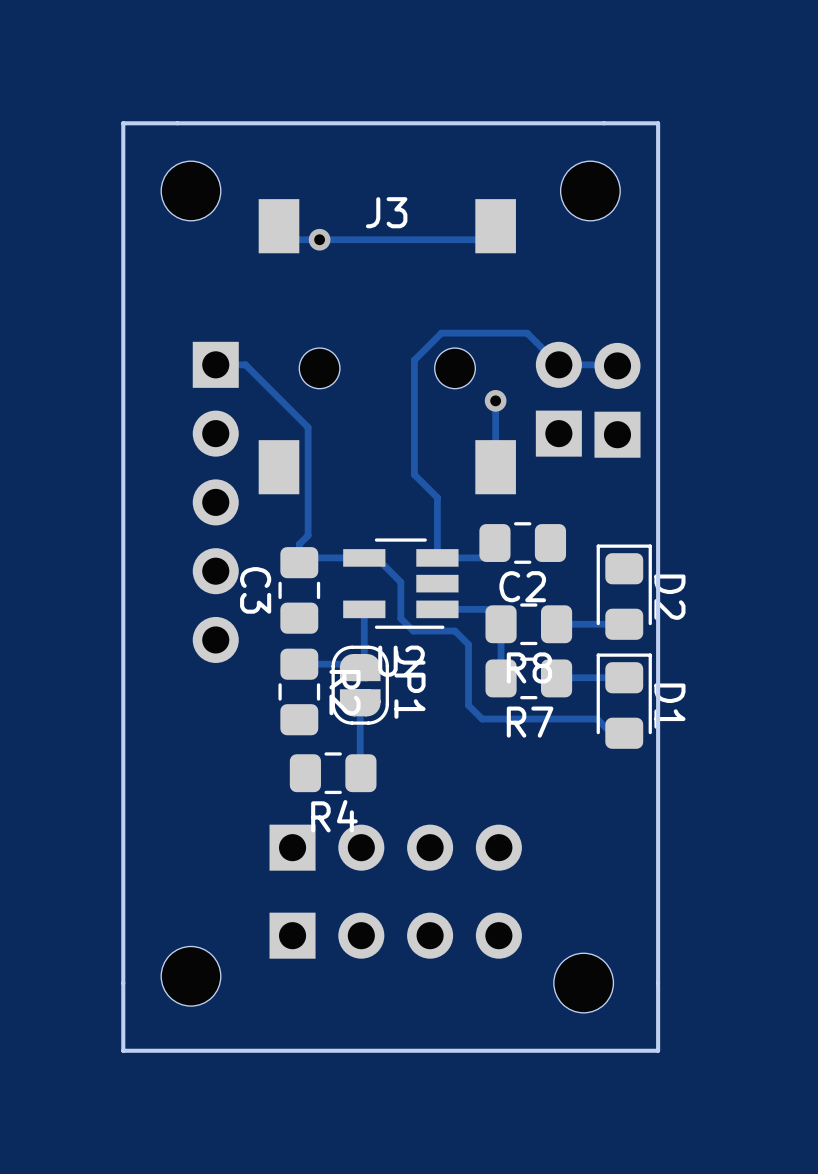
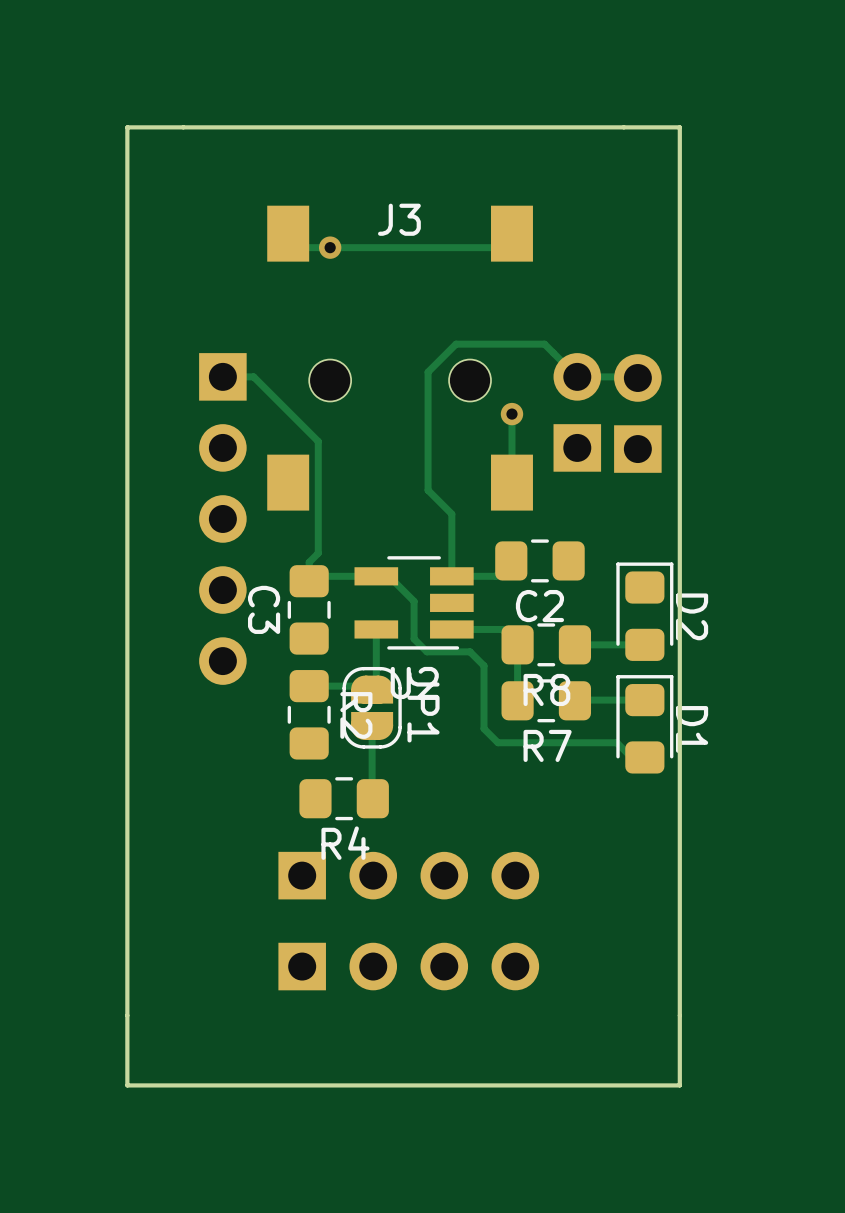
part: (190, 190) -> none
part: (590, 190) -> none
part: (190, 976) -> none
part: (583, 983) -> none

